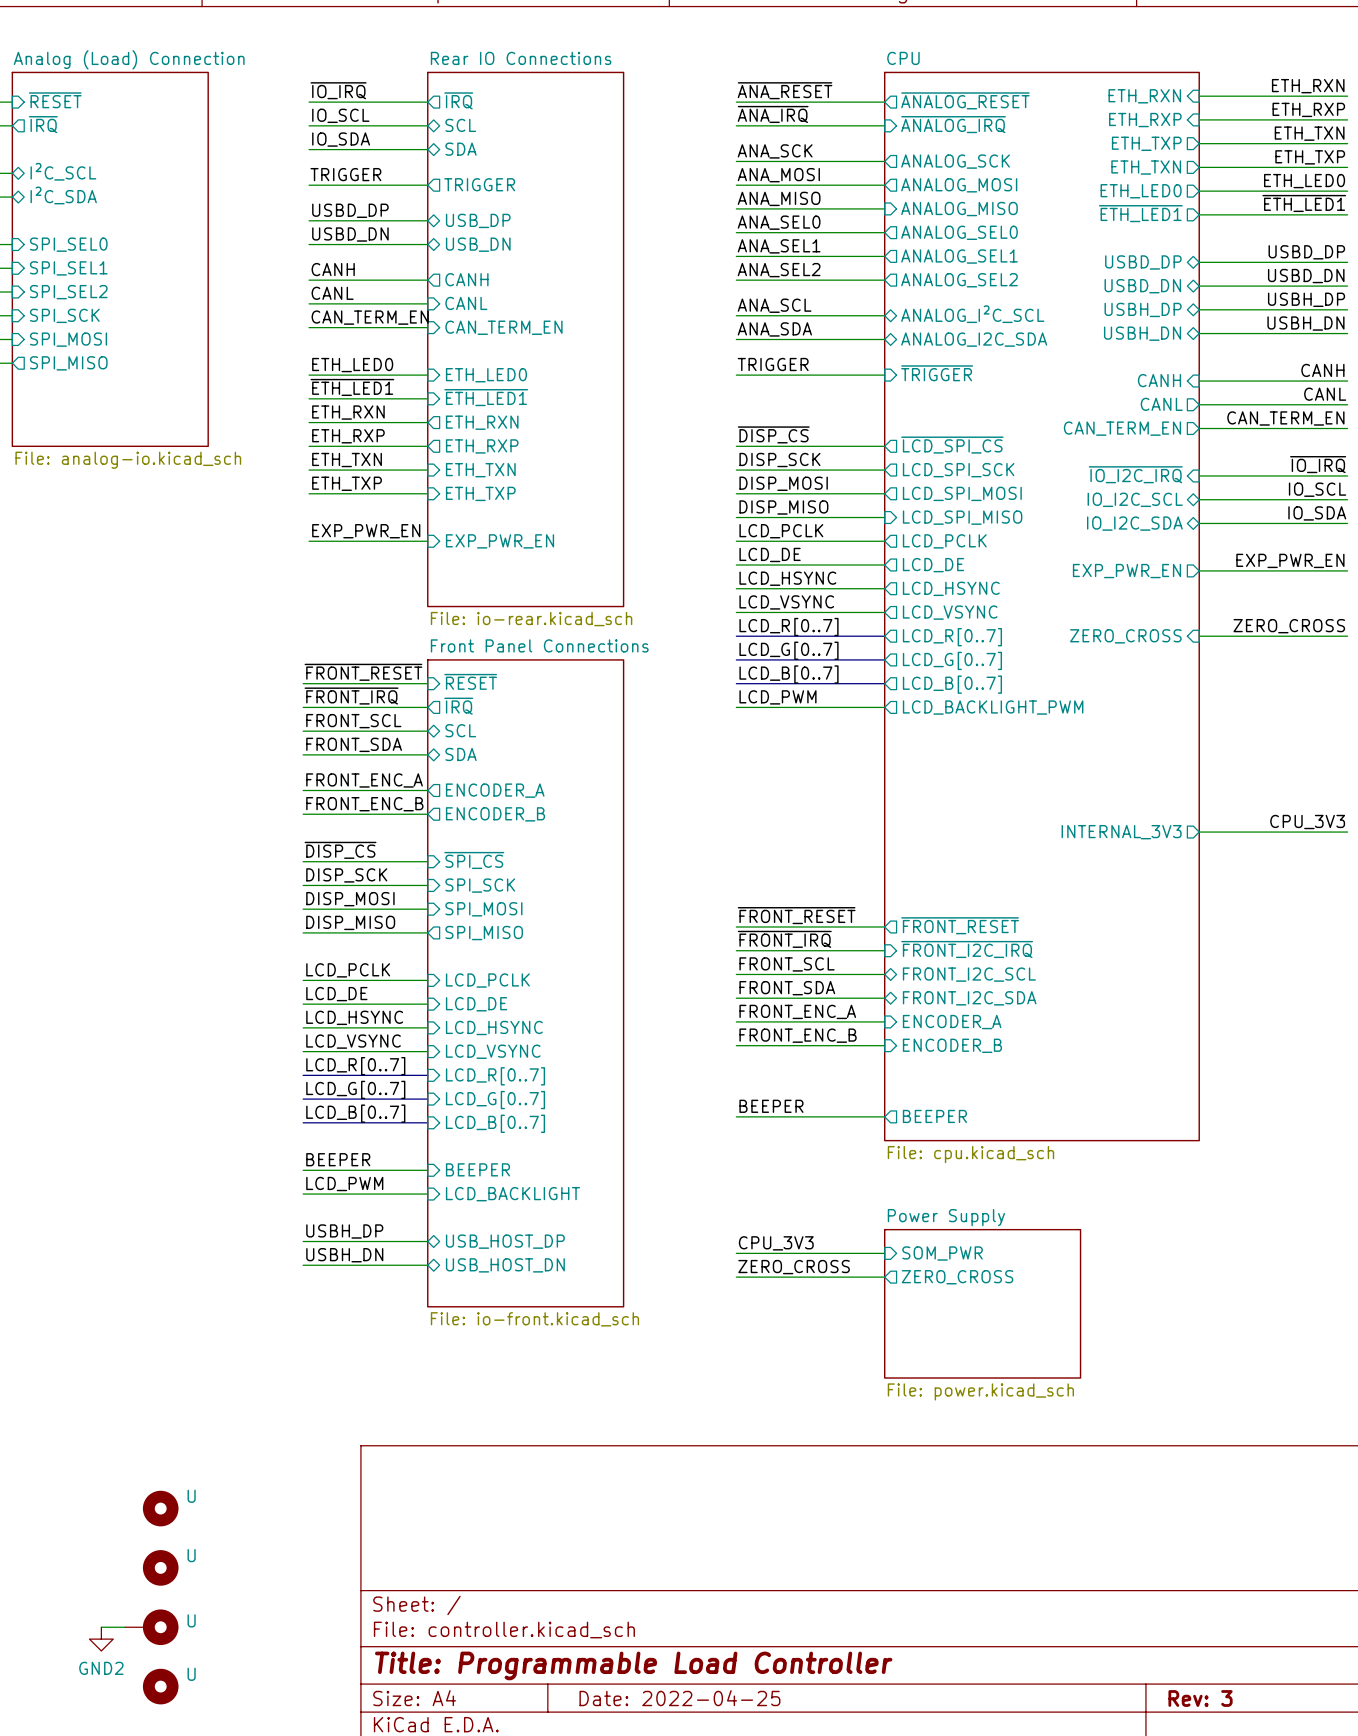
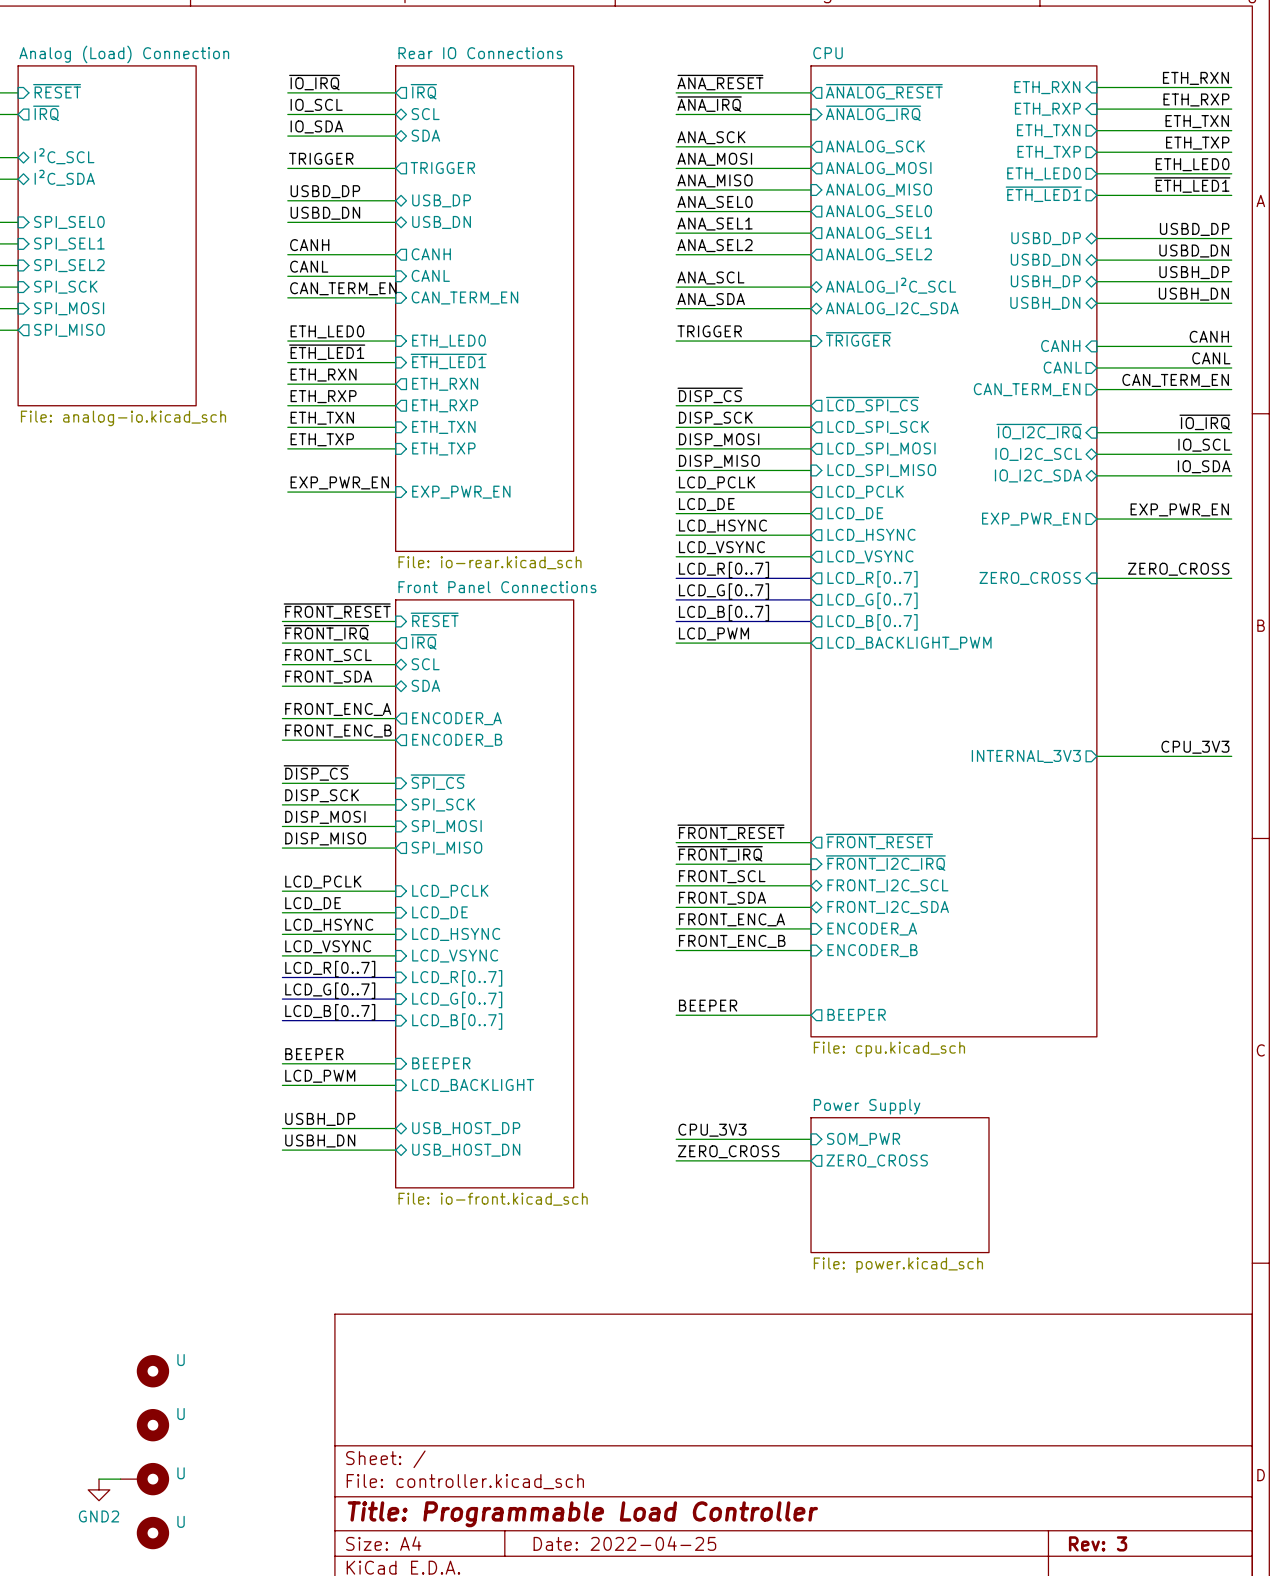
sheet pin: ETH_TXP (1146, 143) -> ETH_TXN (1048, 130)
sheet pin: ETH_TXN (1146, 167) -> ETH_TXP (1049, 152)

